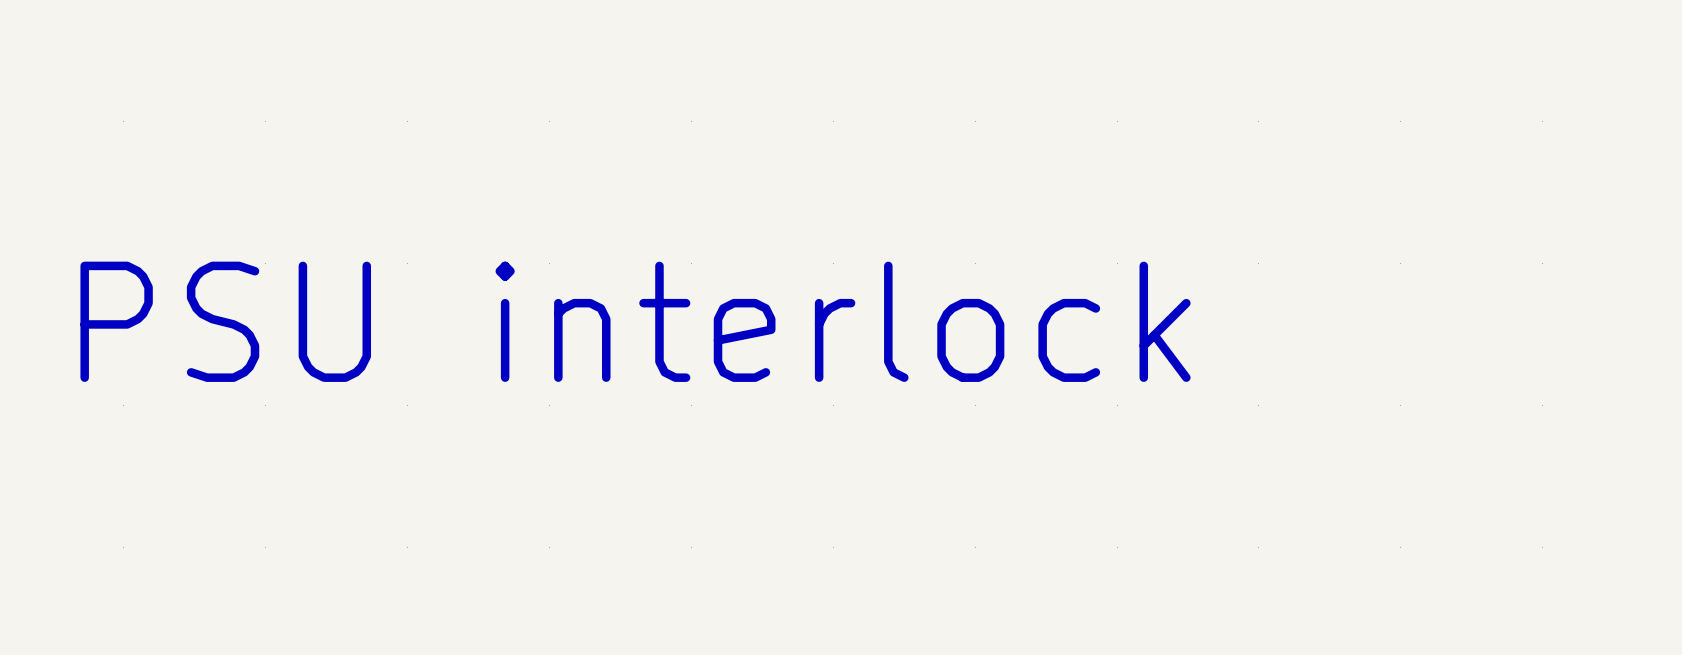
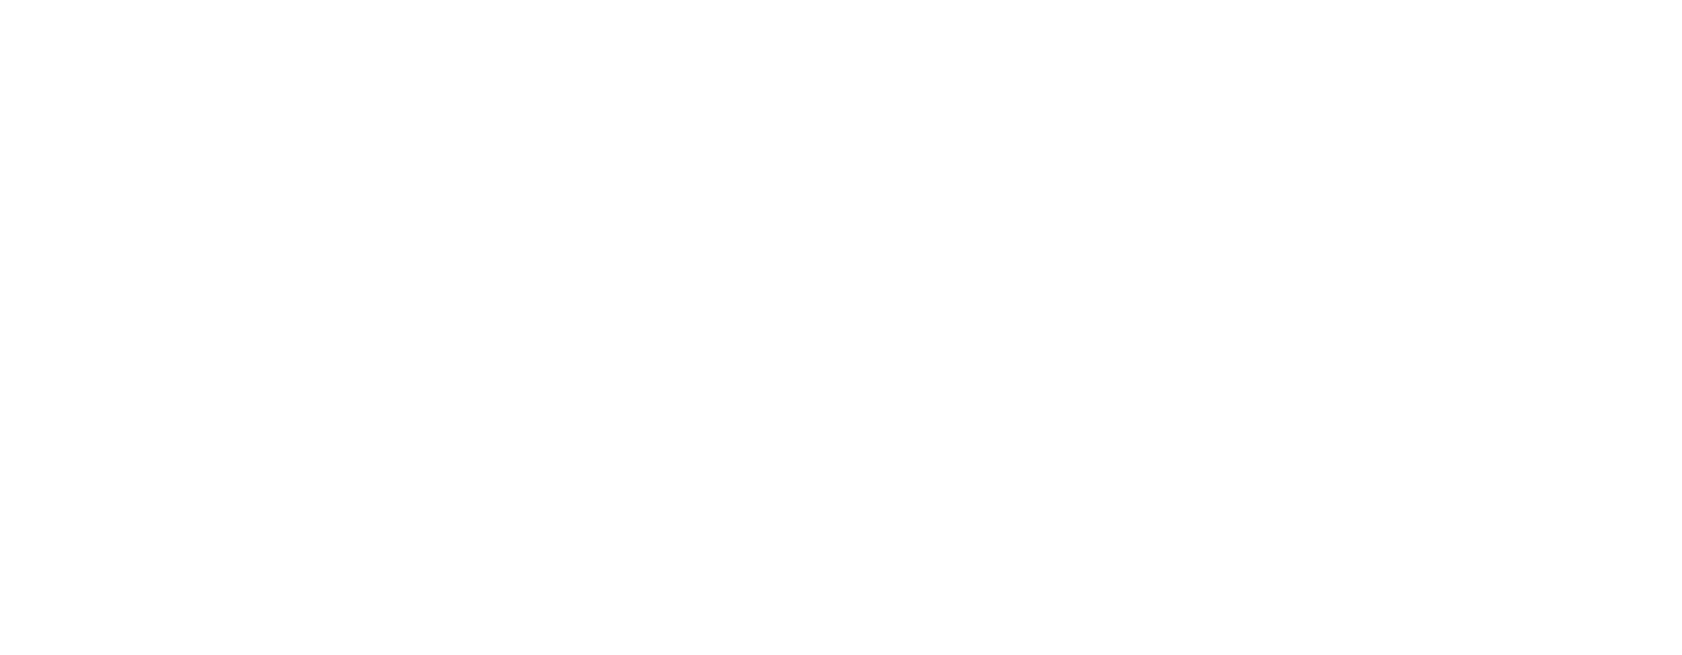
text: PSU interlock (635, 321) -> none

